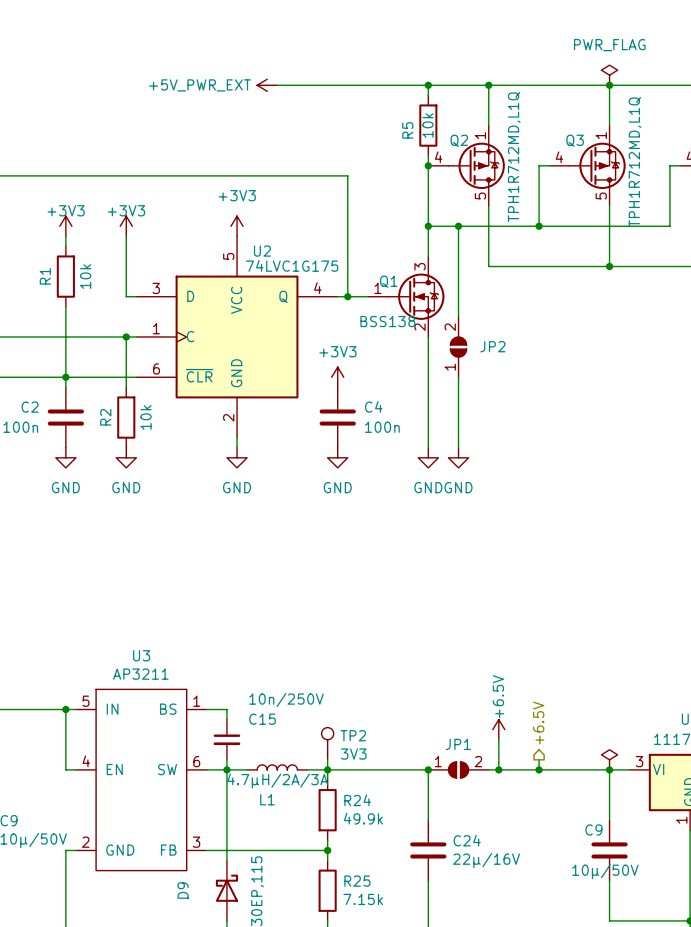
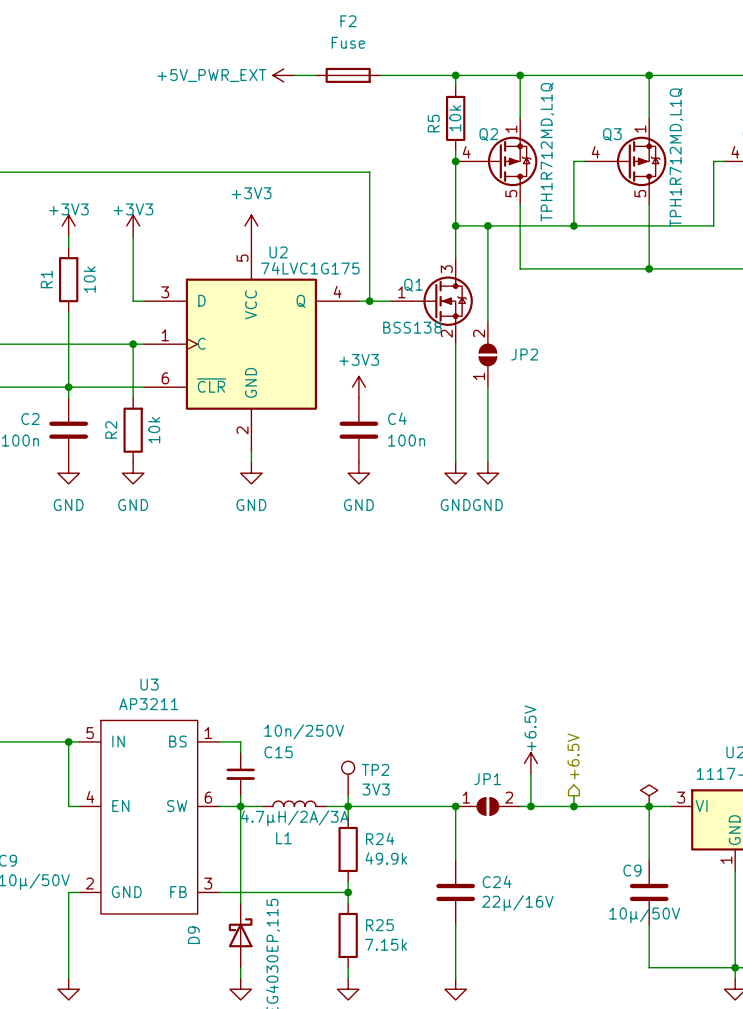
power symbol: PWR_FLAG (609, 75) -> none
F2: none -> Fuse (348, 75)

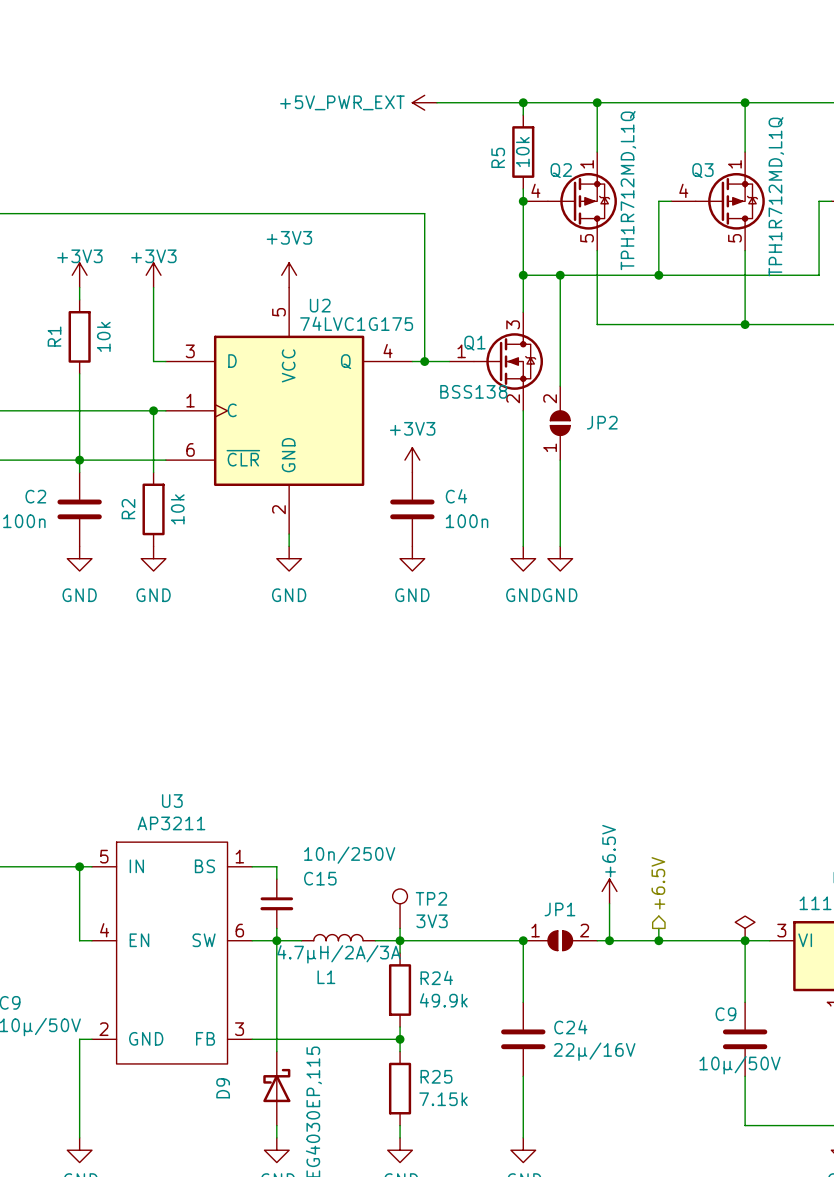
power symbol position: +5V_PWR_EXT (283, 75) -> +5V_PWR_EXT (424, 102)
wire: (294, 75) (315, 75) -> none
F2: Fuse (348, 75) -> none

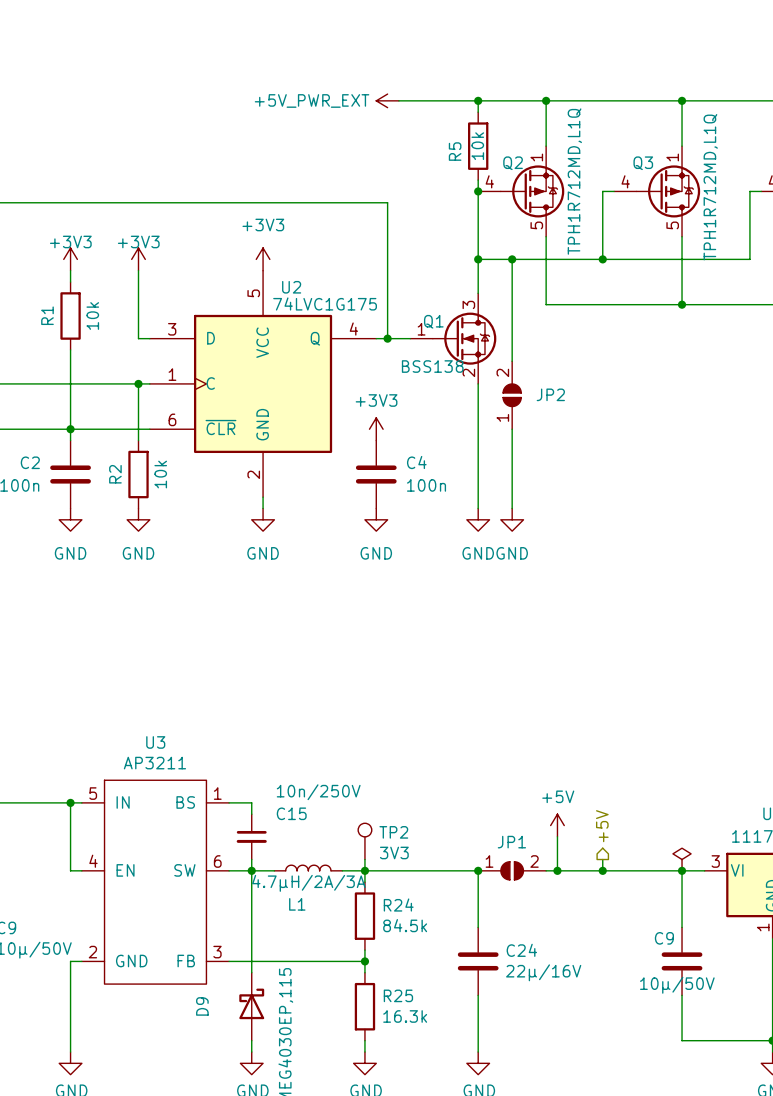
hierarchical label: +6.5V (658, 883) -> +5V (602, 826)
power symbol: +6.5V (609, 891) -> +5V (557, 825)
R24 value: 49.9k (443, 1000) -> 84.5k (405, 925)
R25 value: 7.15k (443, 1099) -> 16.3k (405, 1016)

